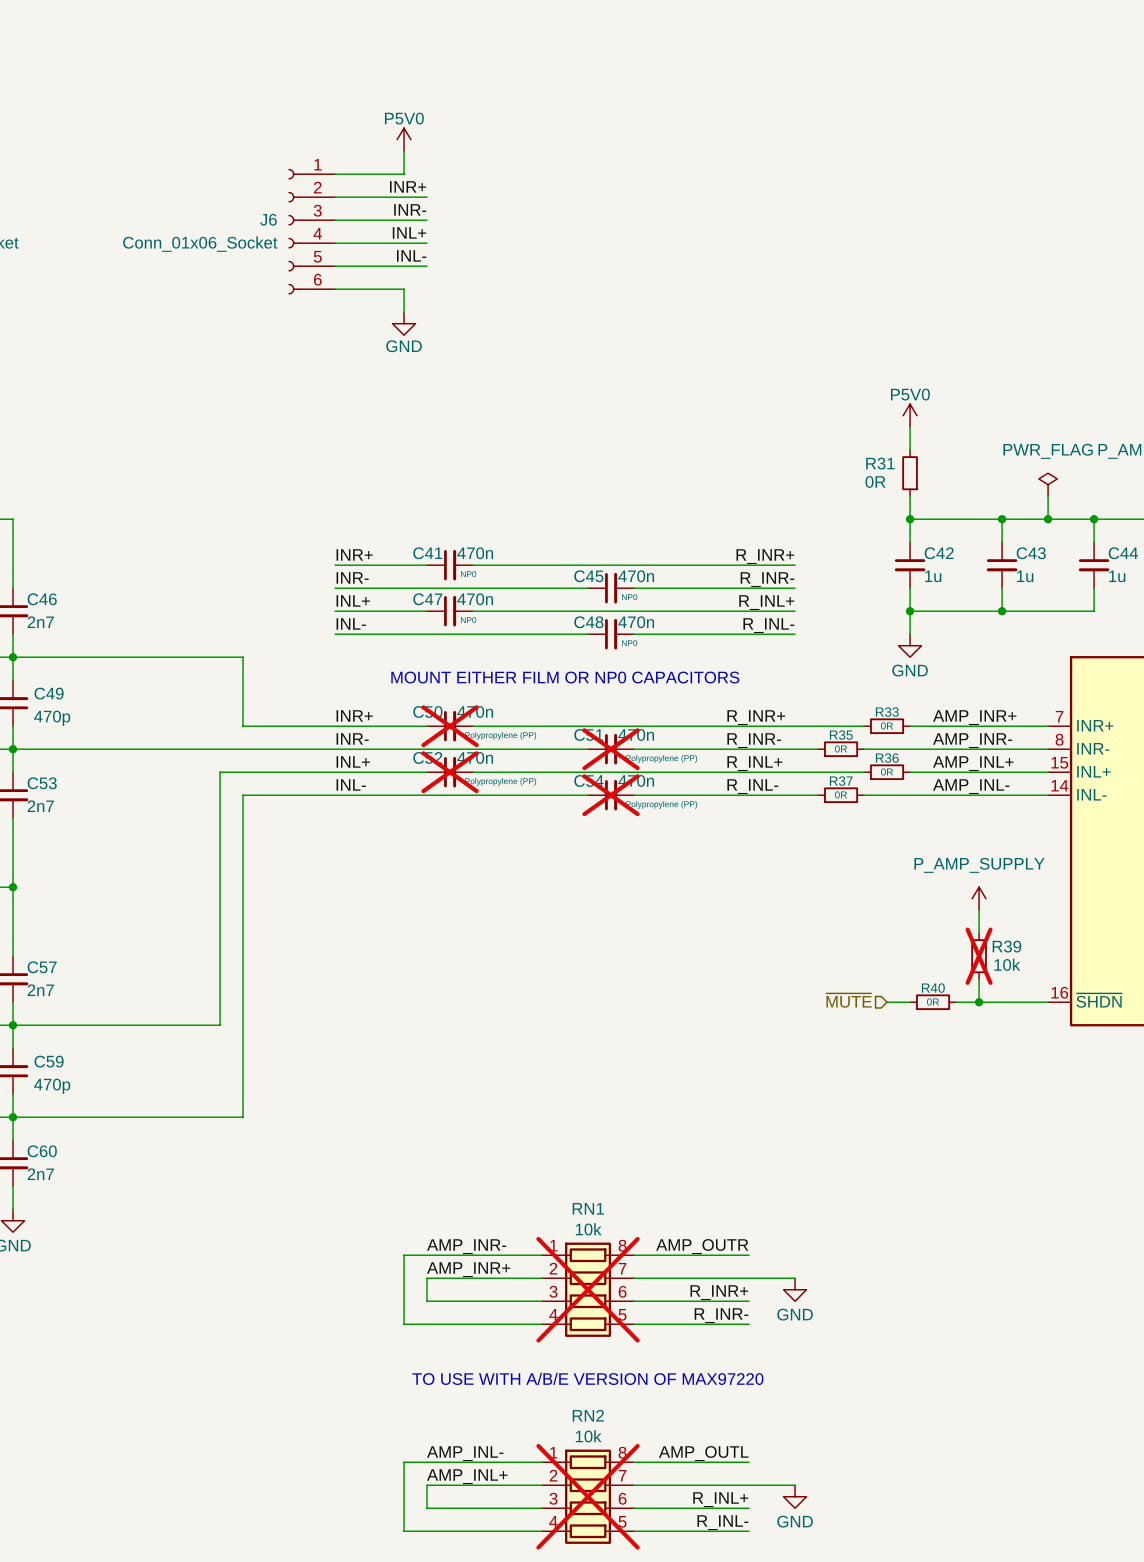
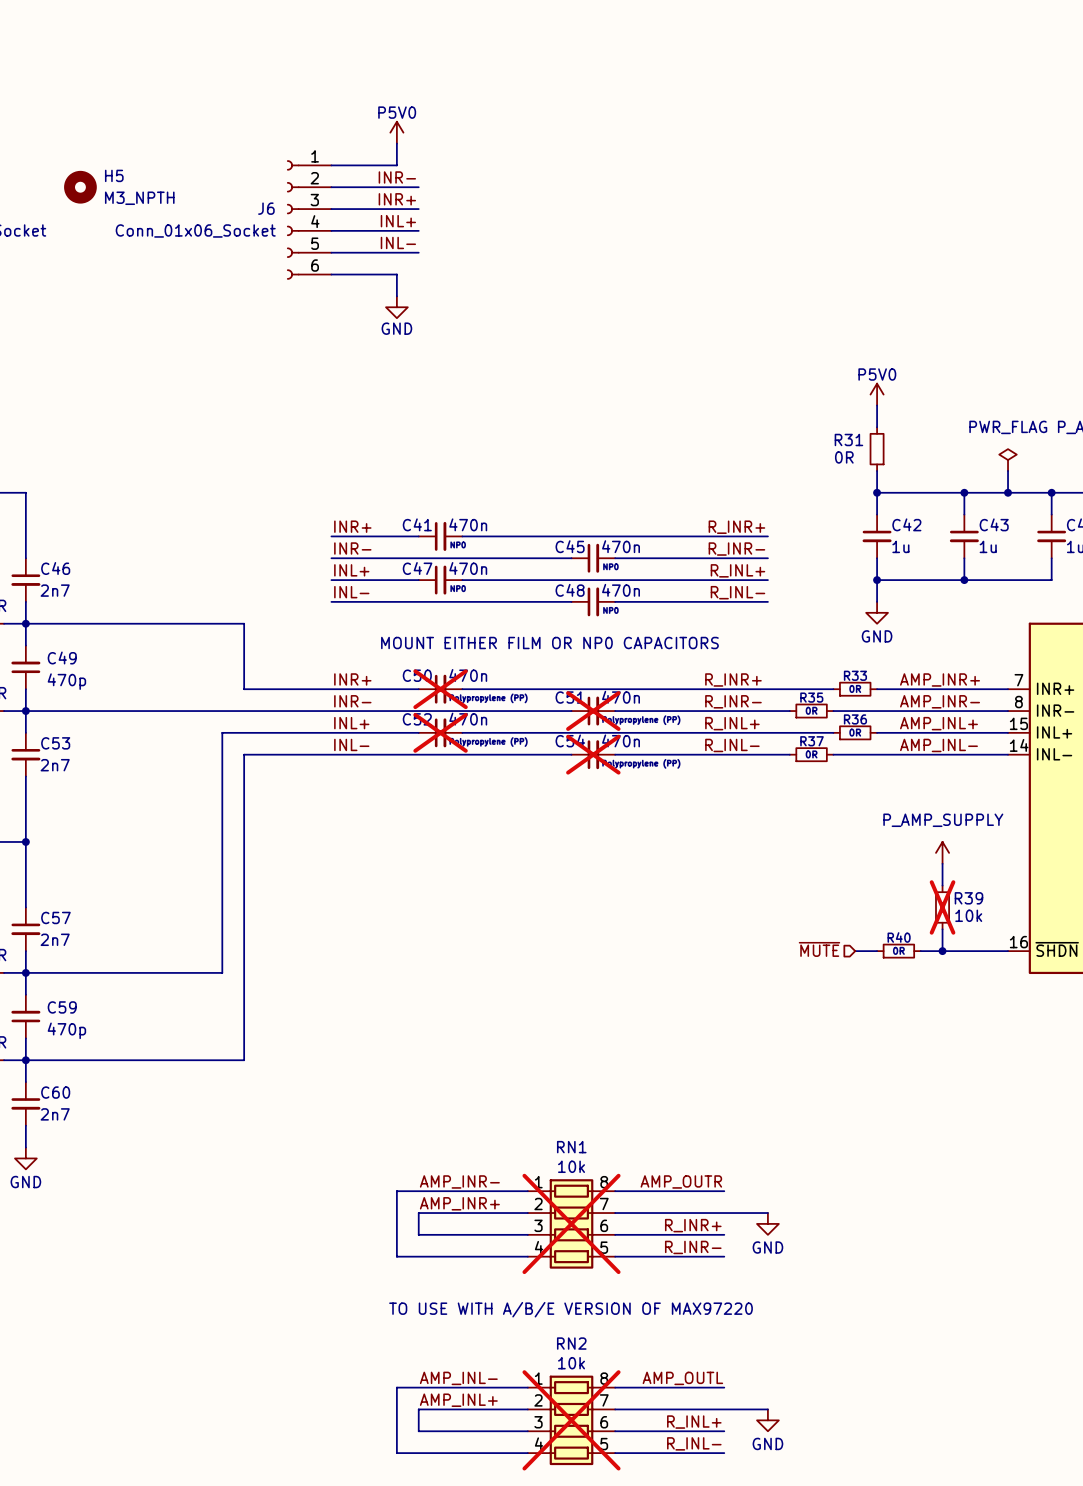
label: INR+ (408, 186) -> INR- (397, 177)
H5: none -> M3_NPTH (80, 187)
label: INR- (410, 209) -> INR+ (397, 199)

